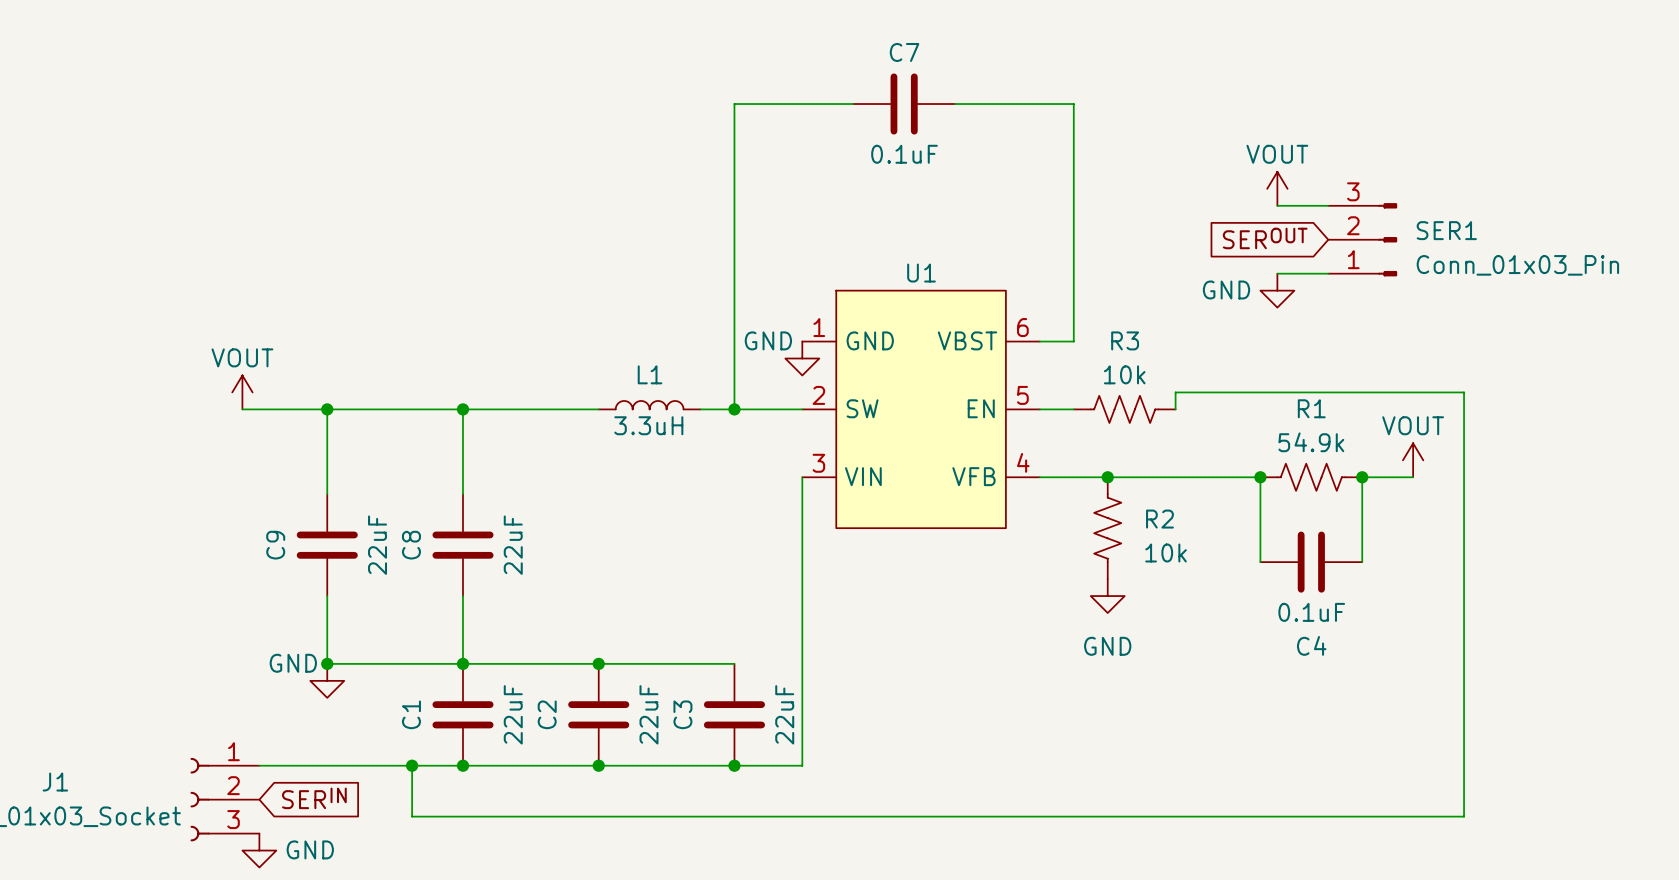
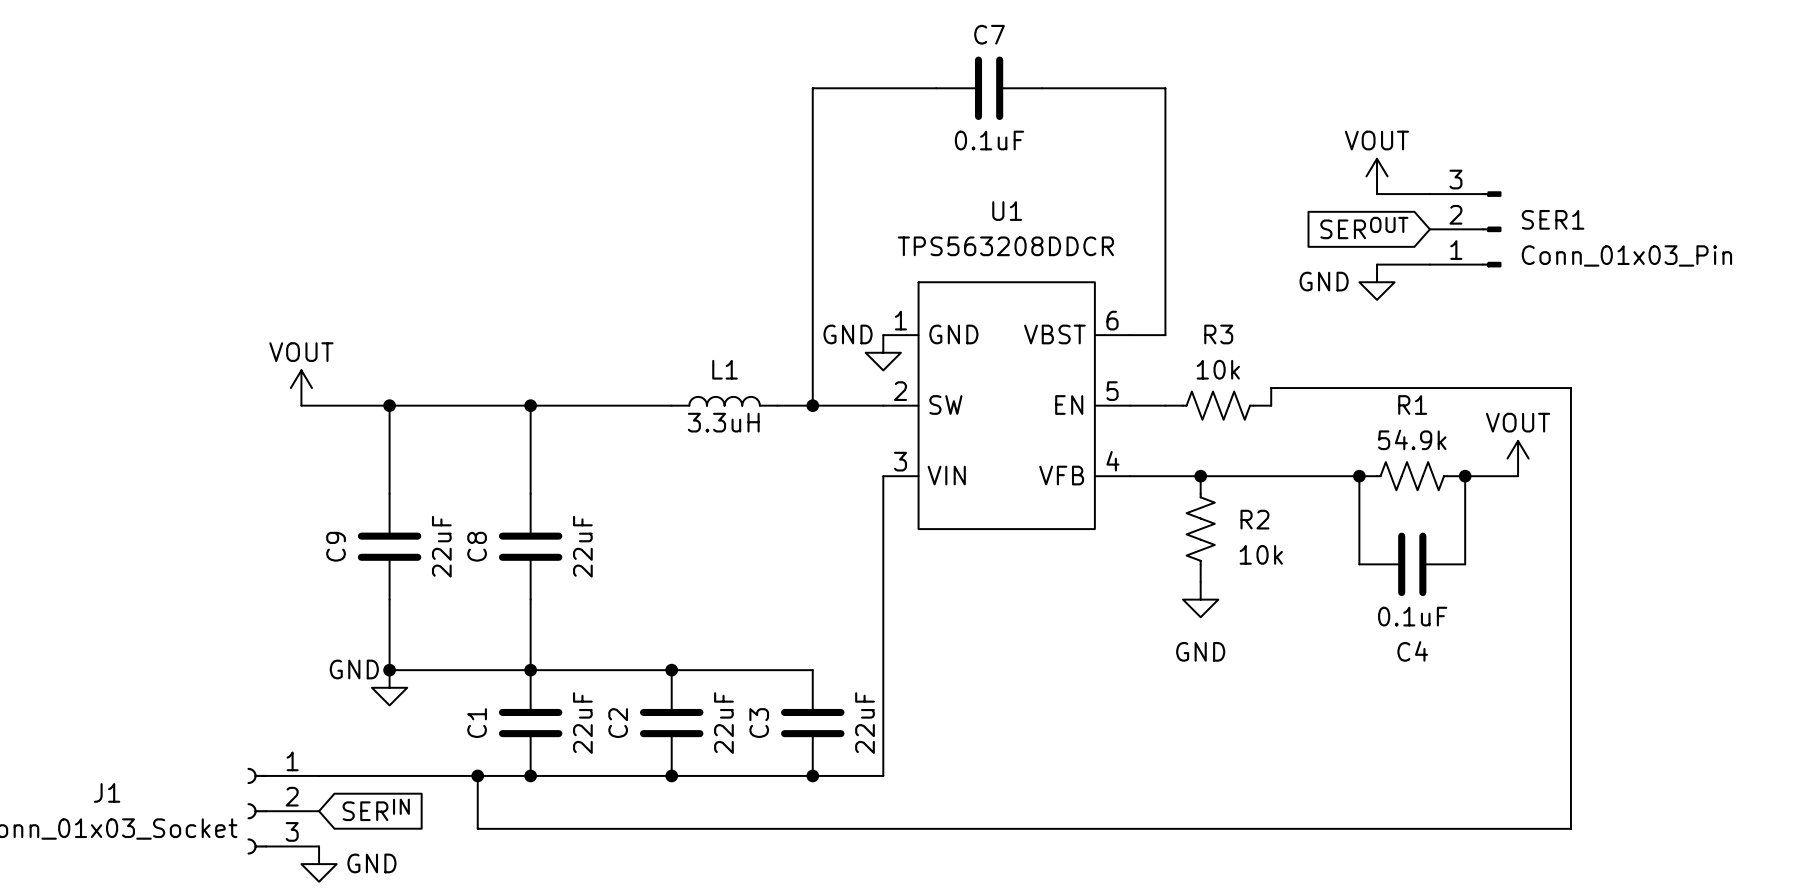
U1 value: none -> TPS563208DDCR (1005, 246)
U1 name position: U1 (921, 273) -> U1 (1007, 211)

